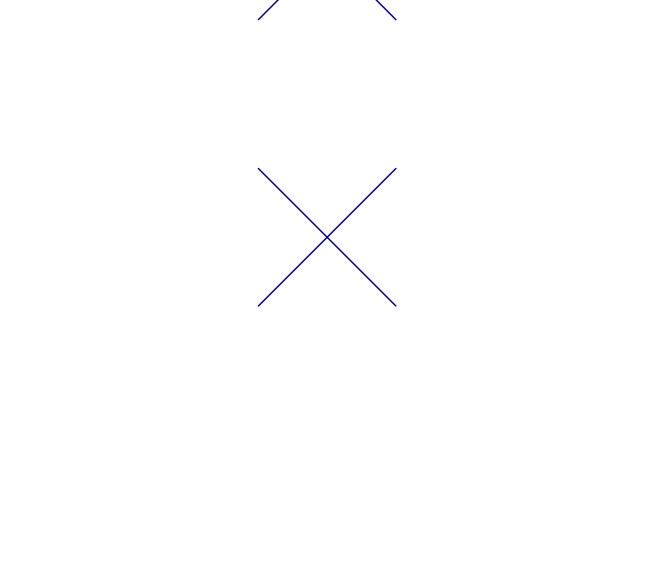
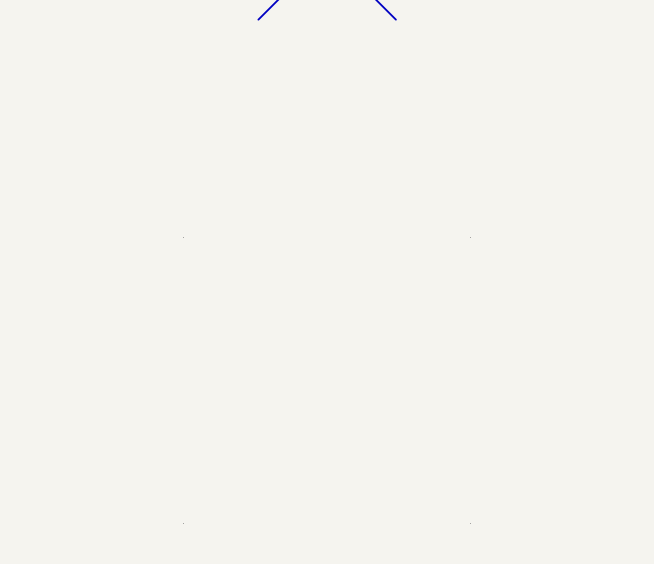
no-connect mark: (327, 237) -> none

